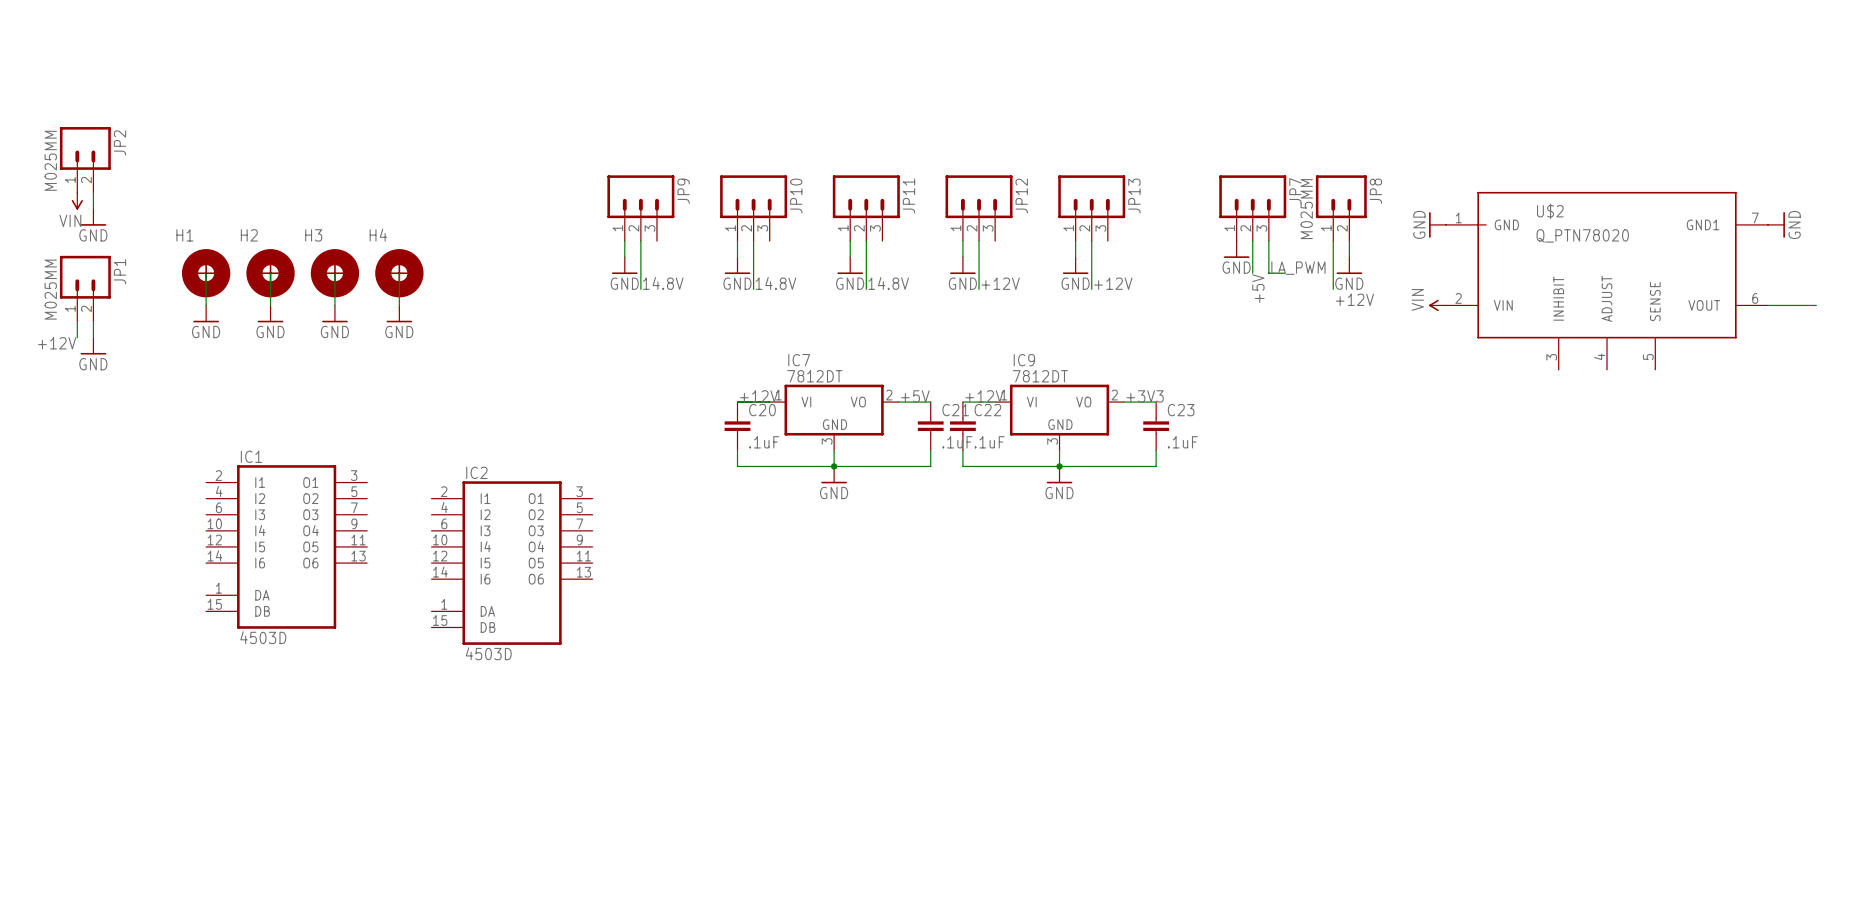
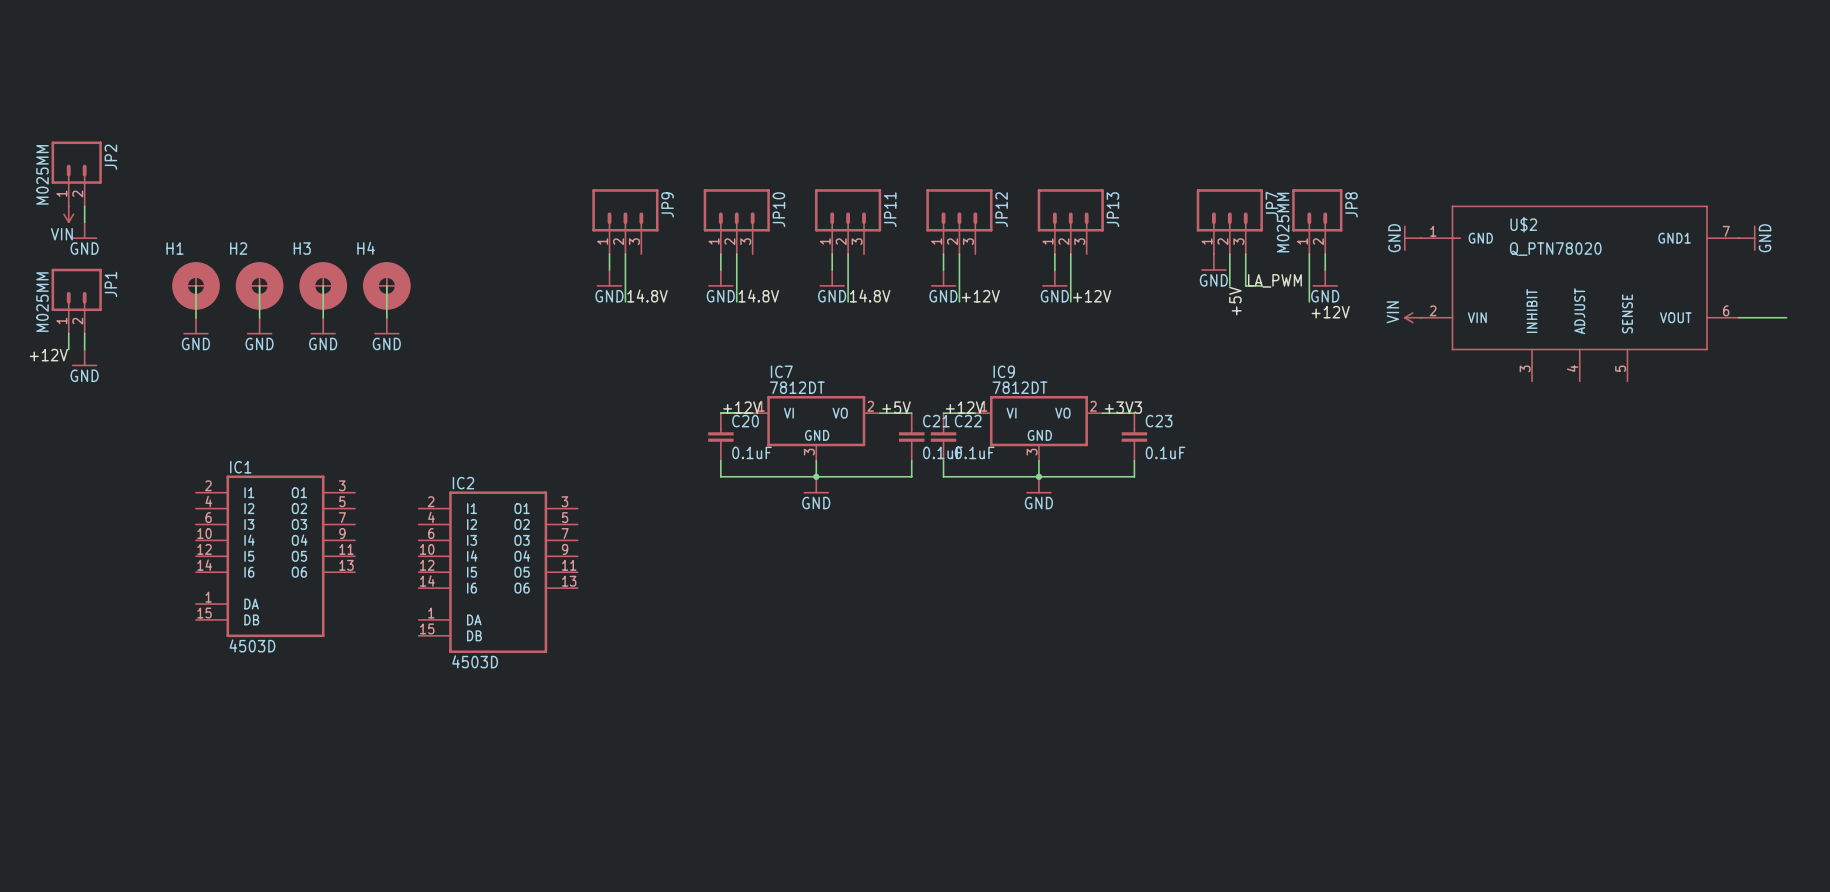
C20 value: .1uF (764, 442) -> 0.1uF (751, 452)
C21 value: .1uF (957, 442) -> 0.1uF (942, 452)
C22 value: .1uF (989, 442) -> 0.1uF (974, 452)
C23 value: .1uF (1182, 442) -> 0.1uF (1165, 452)

